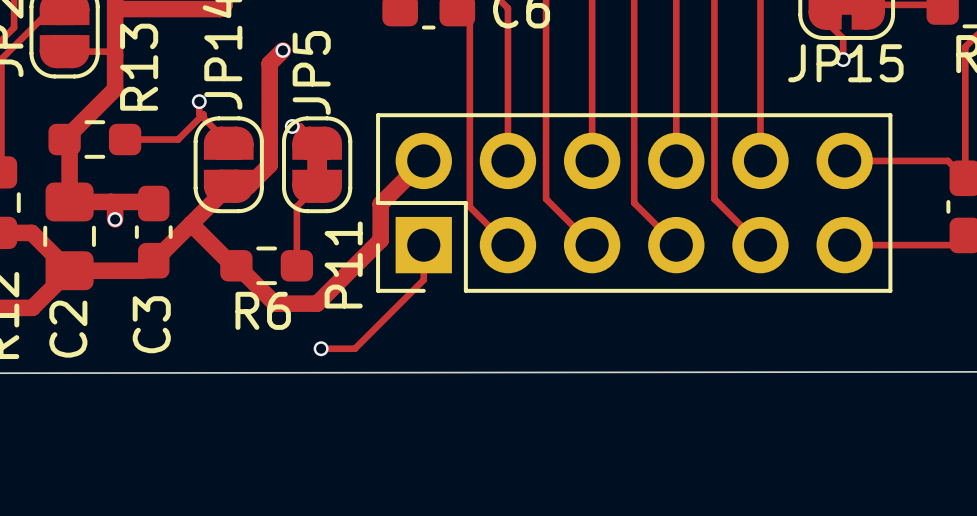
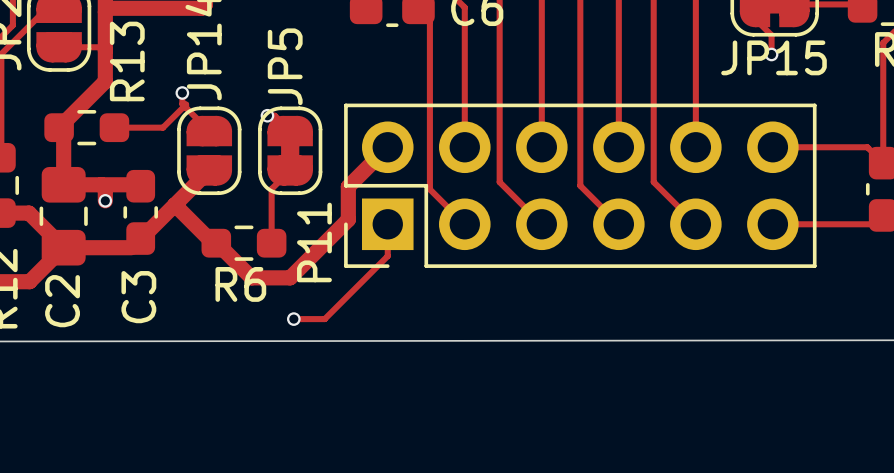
track: (282, 50) (269, 63) (269, 165) (248, 186) (228, 186) -> none
via: (282, 50) -> none

